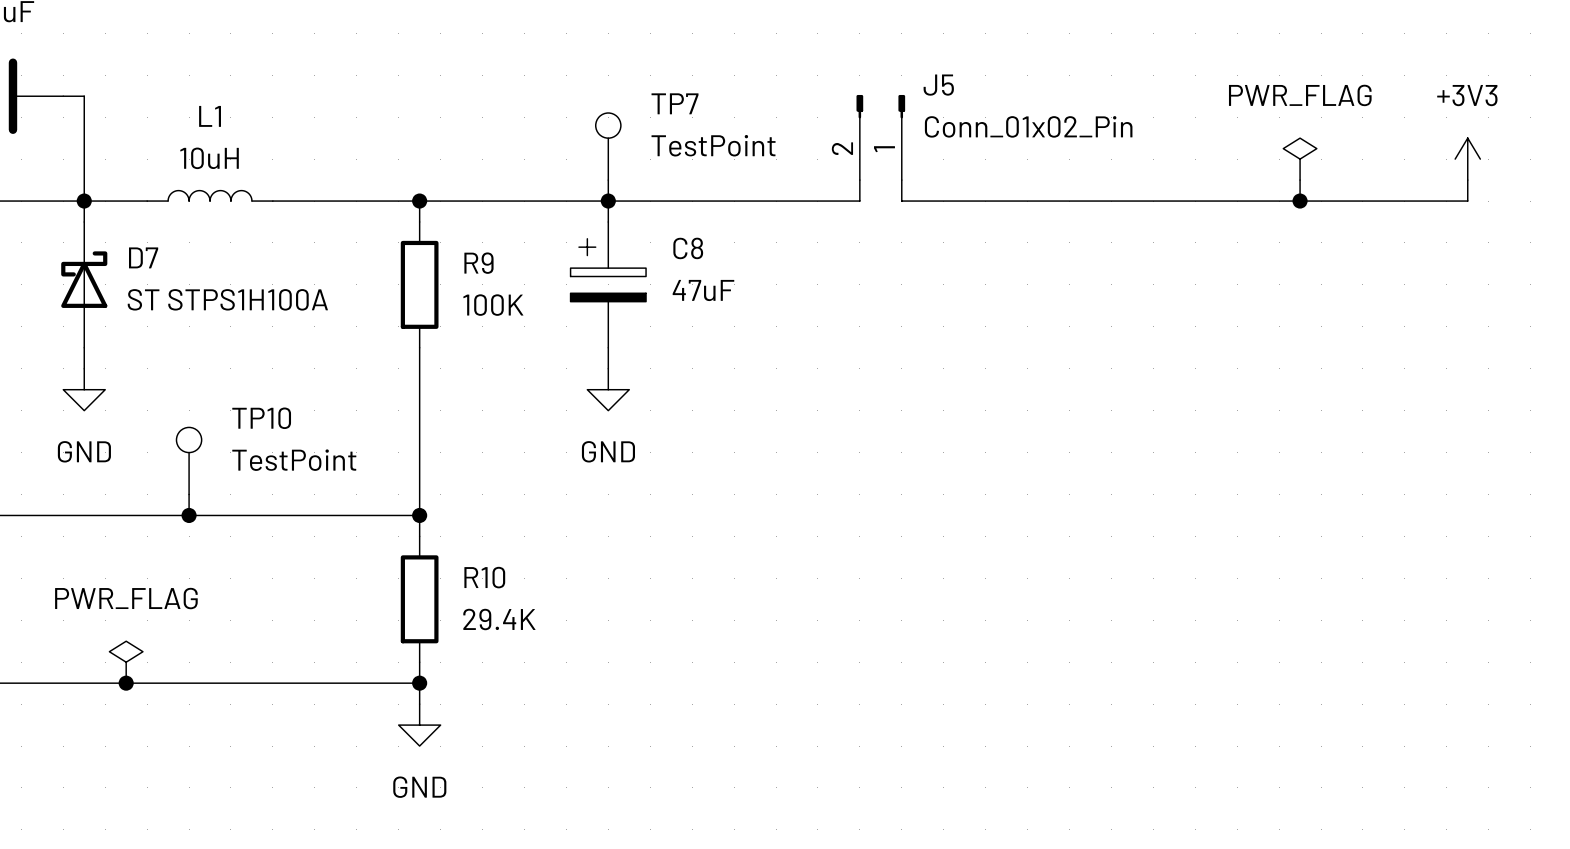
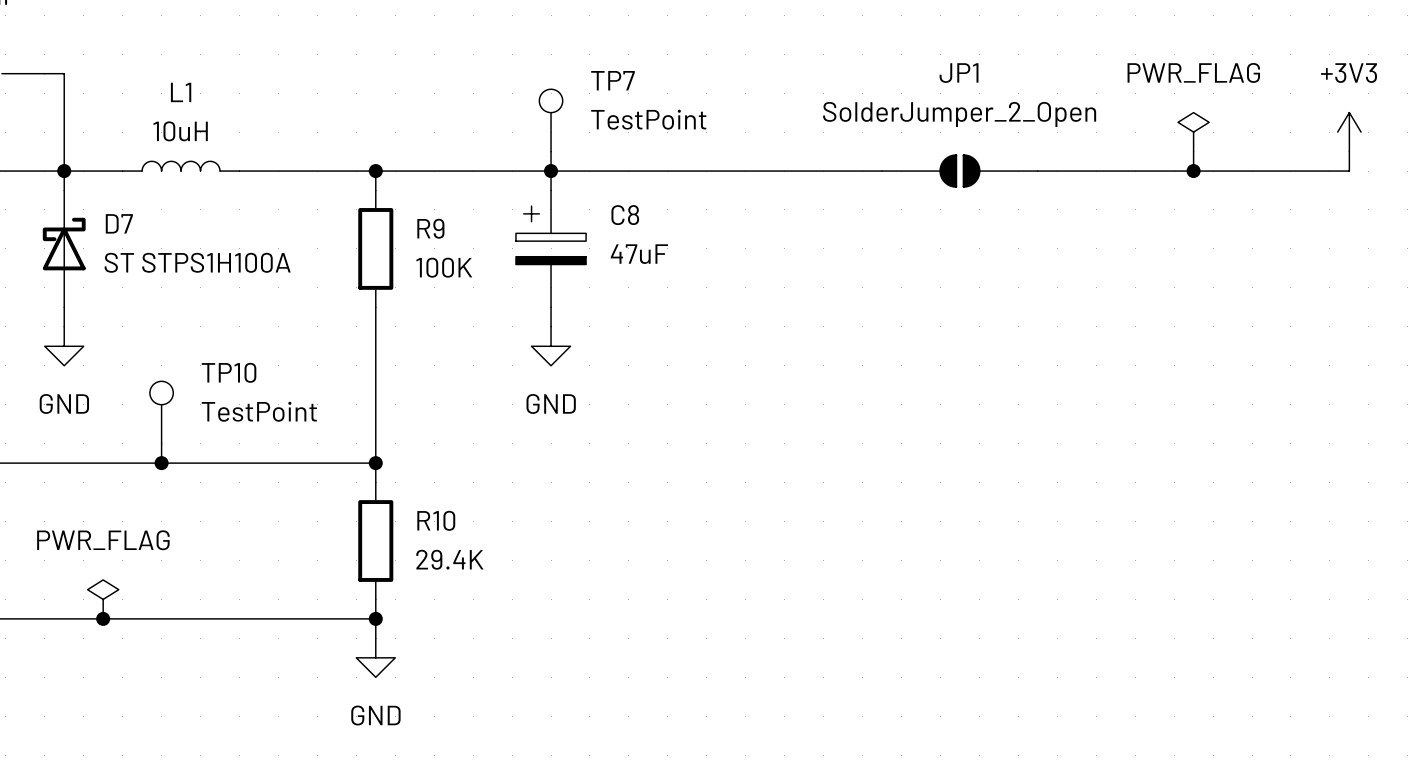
J5: Conn_01x02_Pin (880, 137) -> none
wire: (859, 180) (859, 201) -> (823, 171) (784, 171)
wire: (901, 180) (901, 201) -> none
JP1: none -> SolderJumper_2_Open (959, 171)

